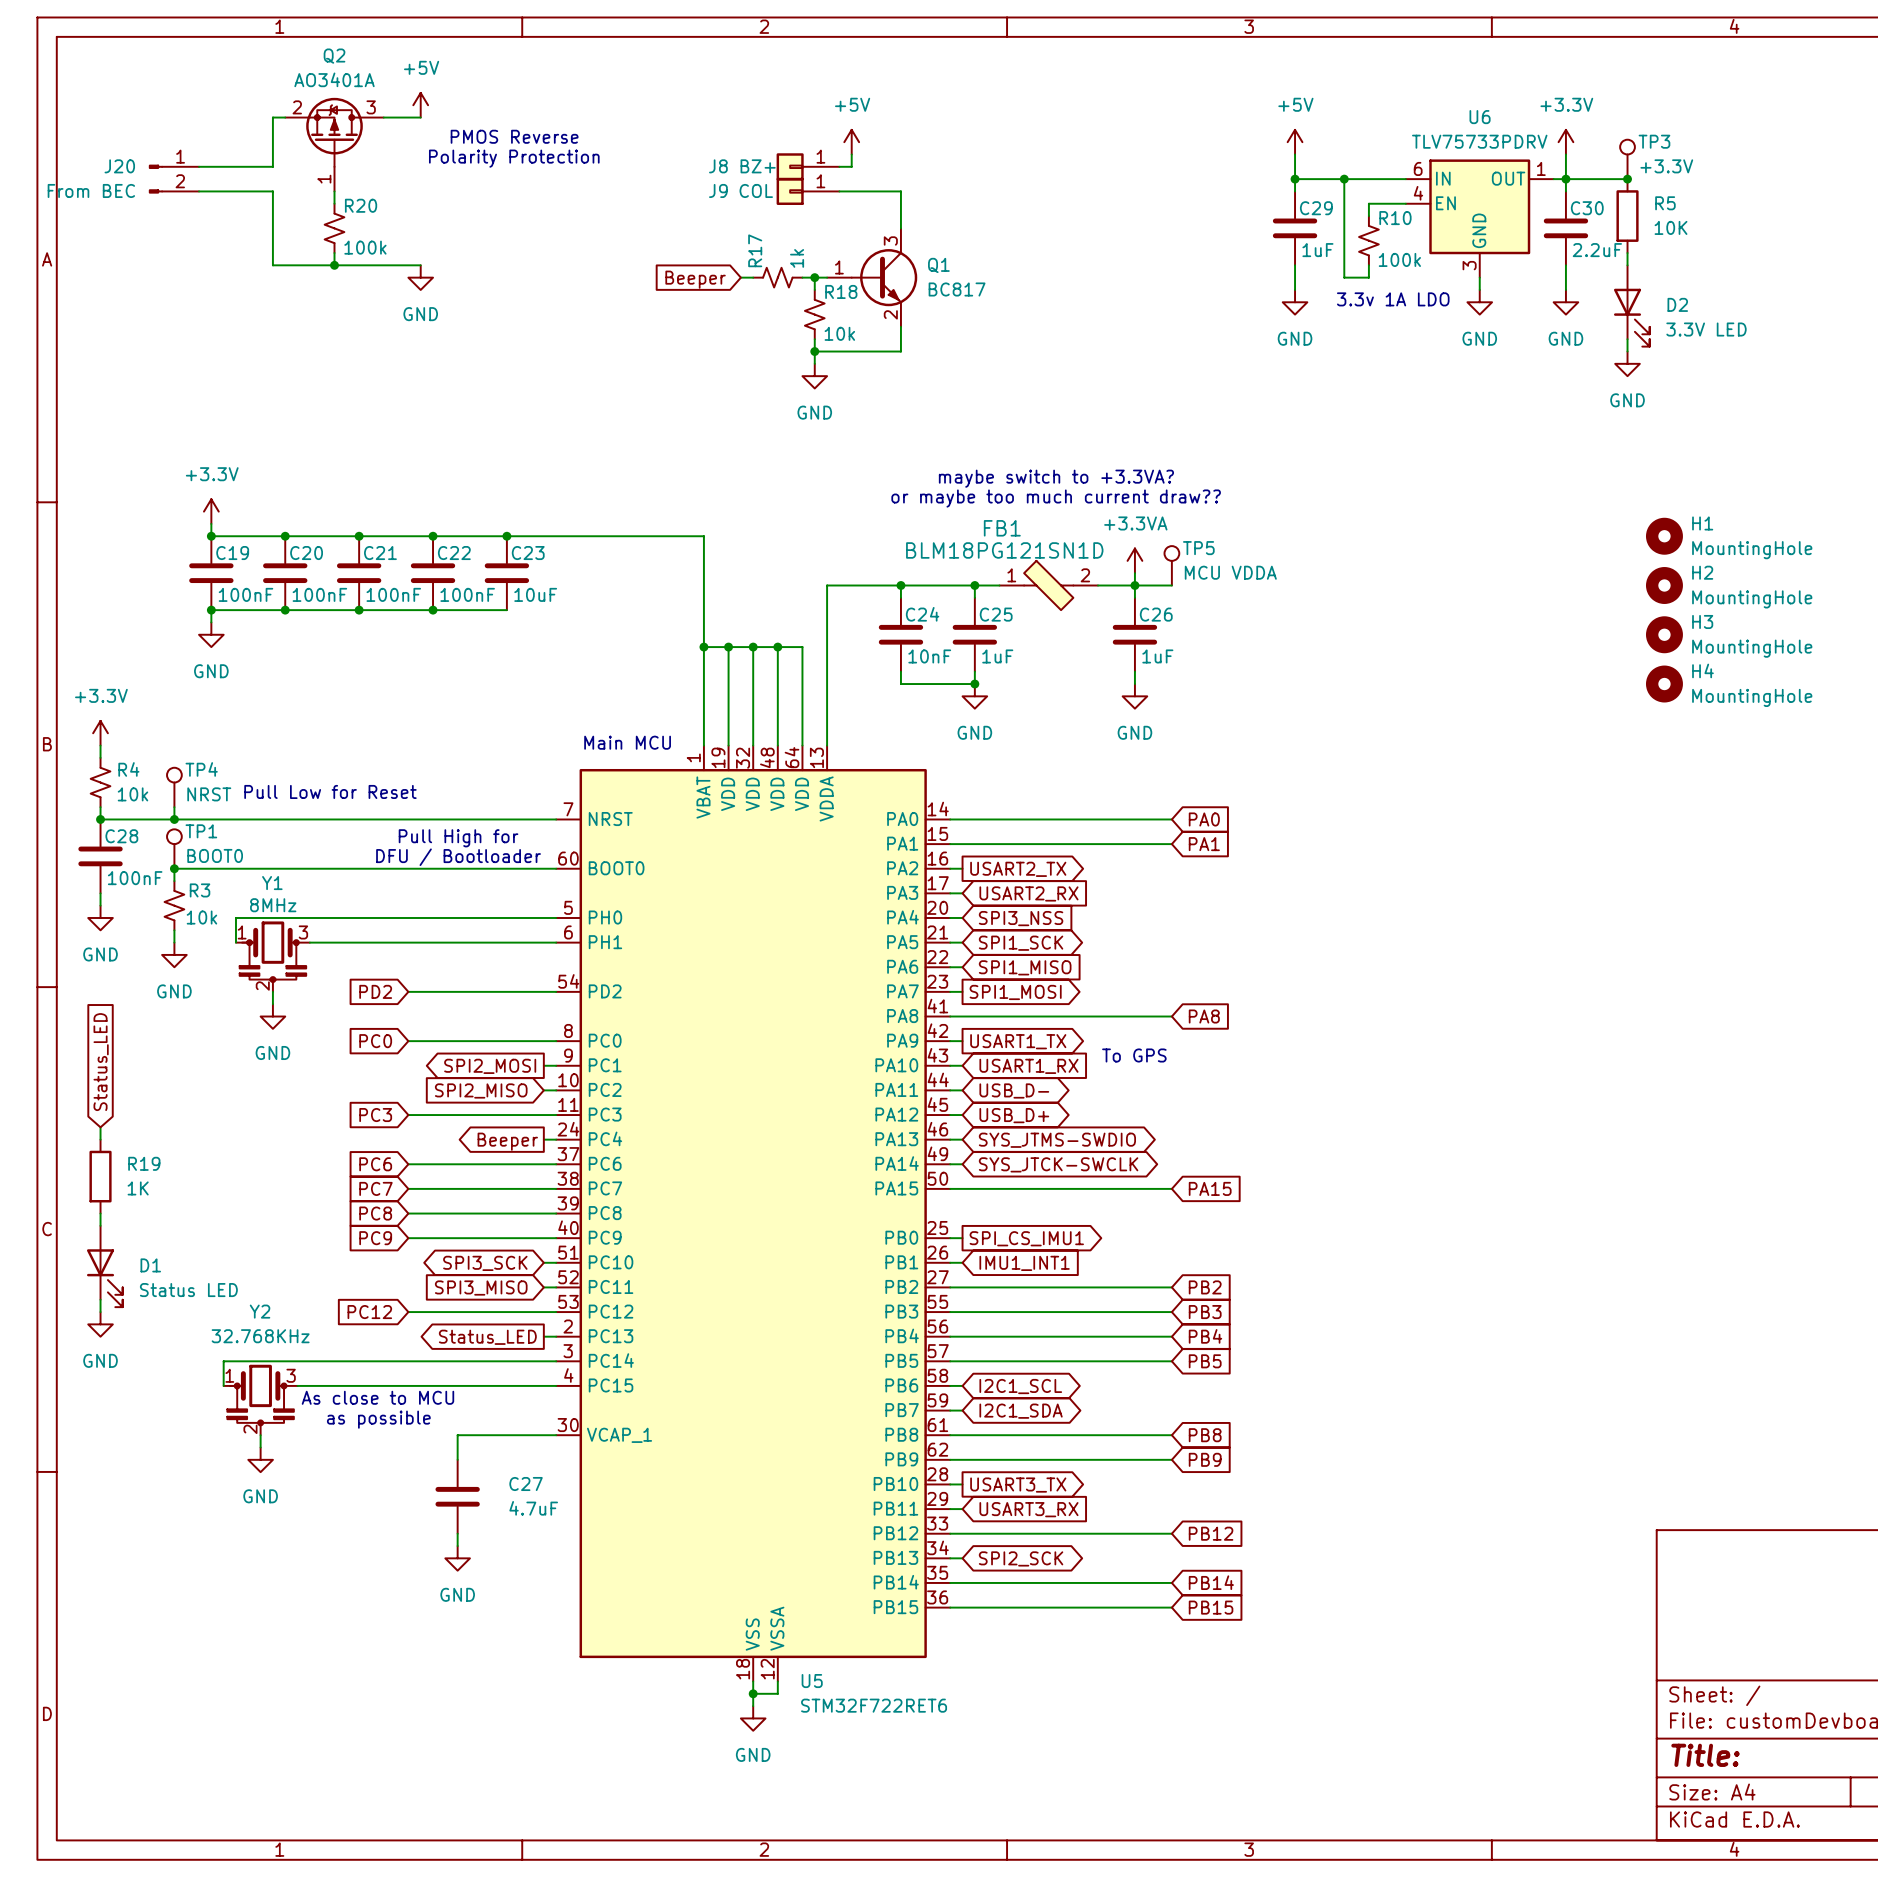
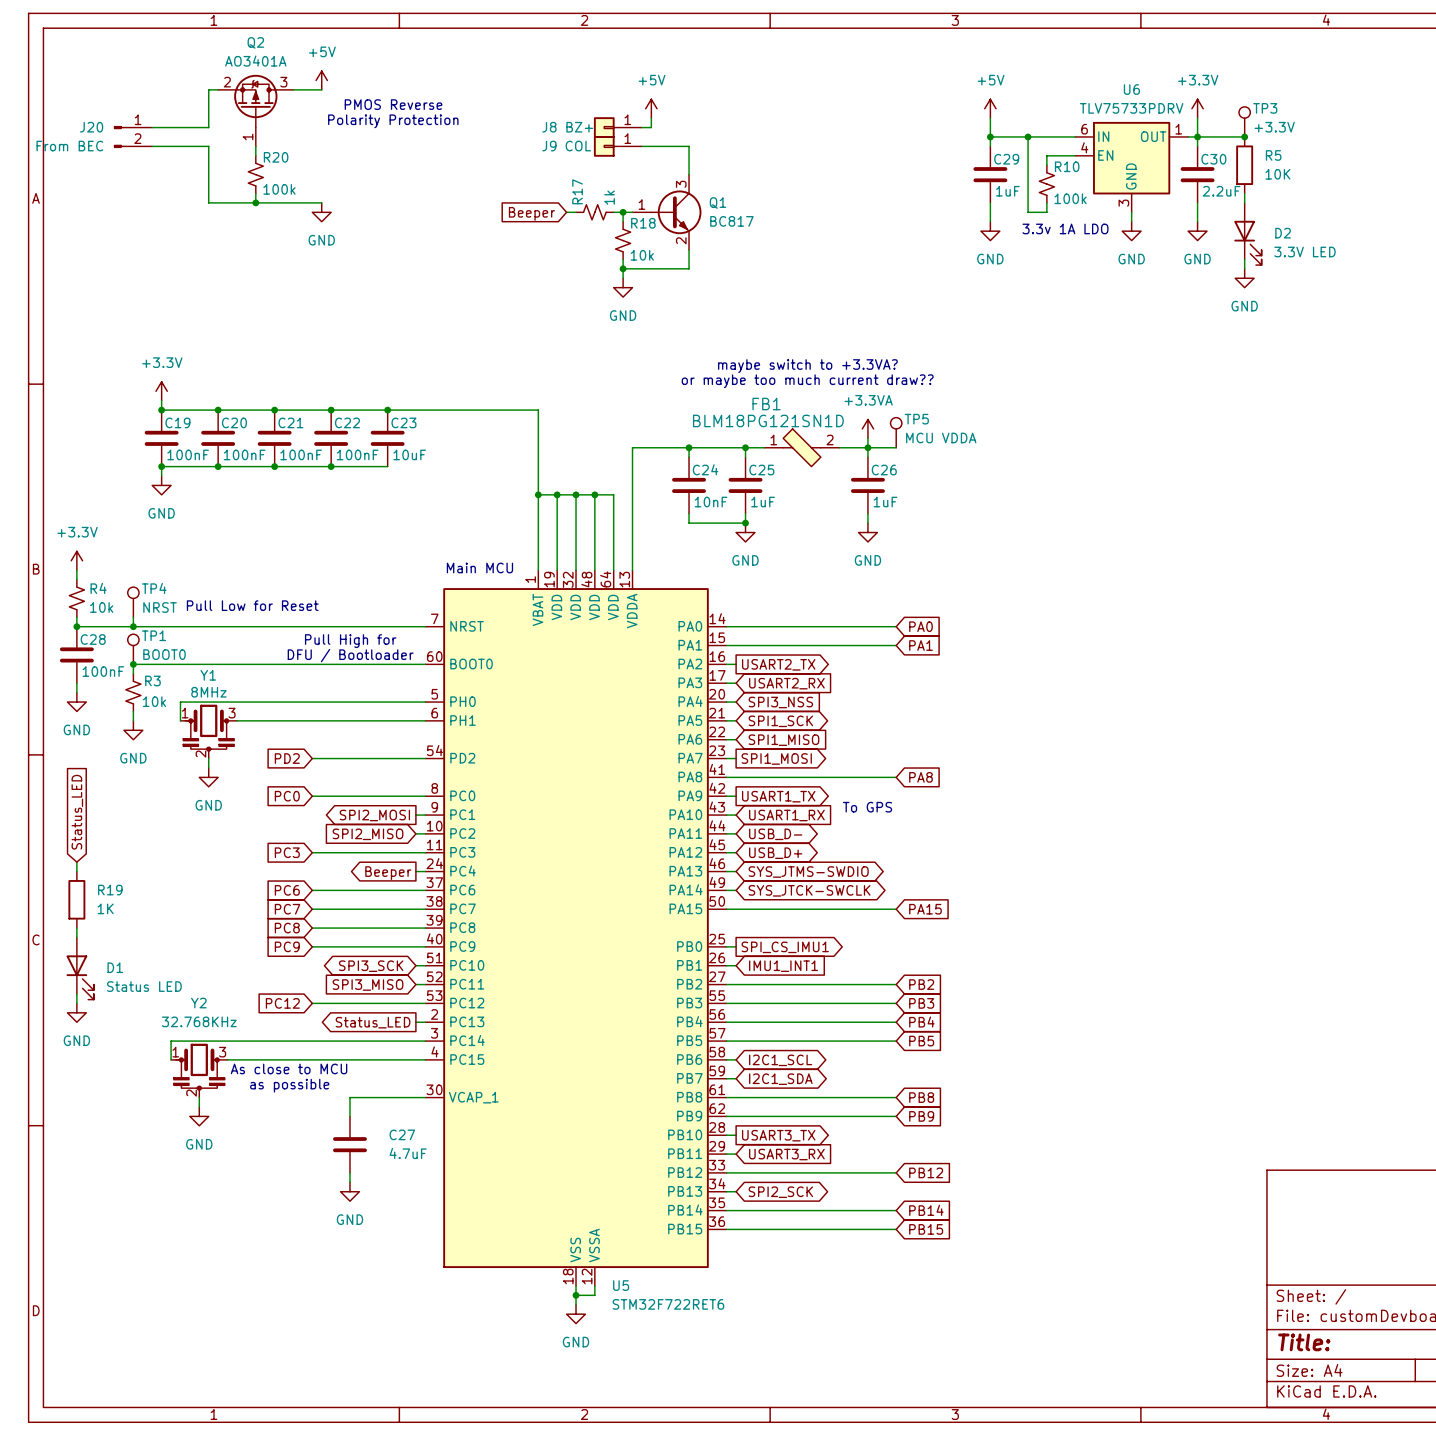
H1: MountingHole (1664, 536) -> none
H2: MountingHole (1664, 585) -> none
H3: MountingHole (1664, 634) -> none
H4: MountingHole (1664, 684) -> none

